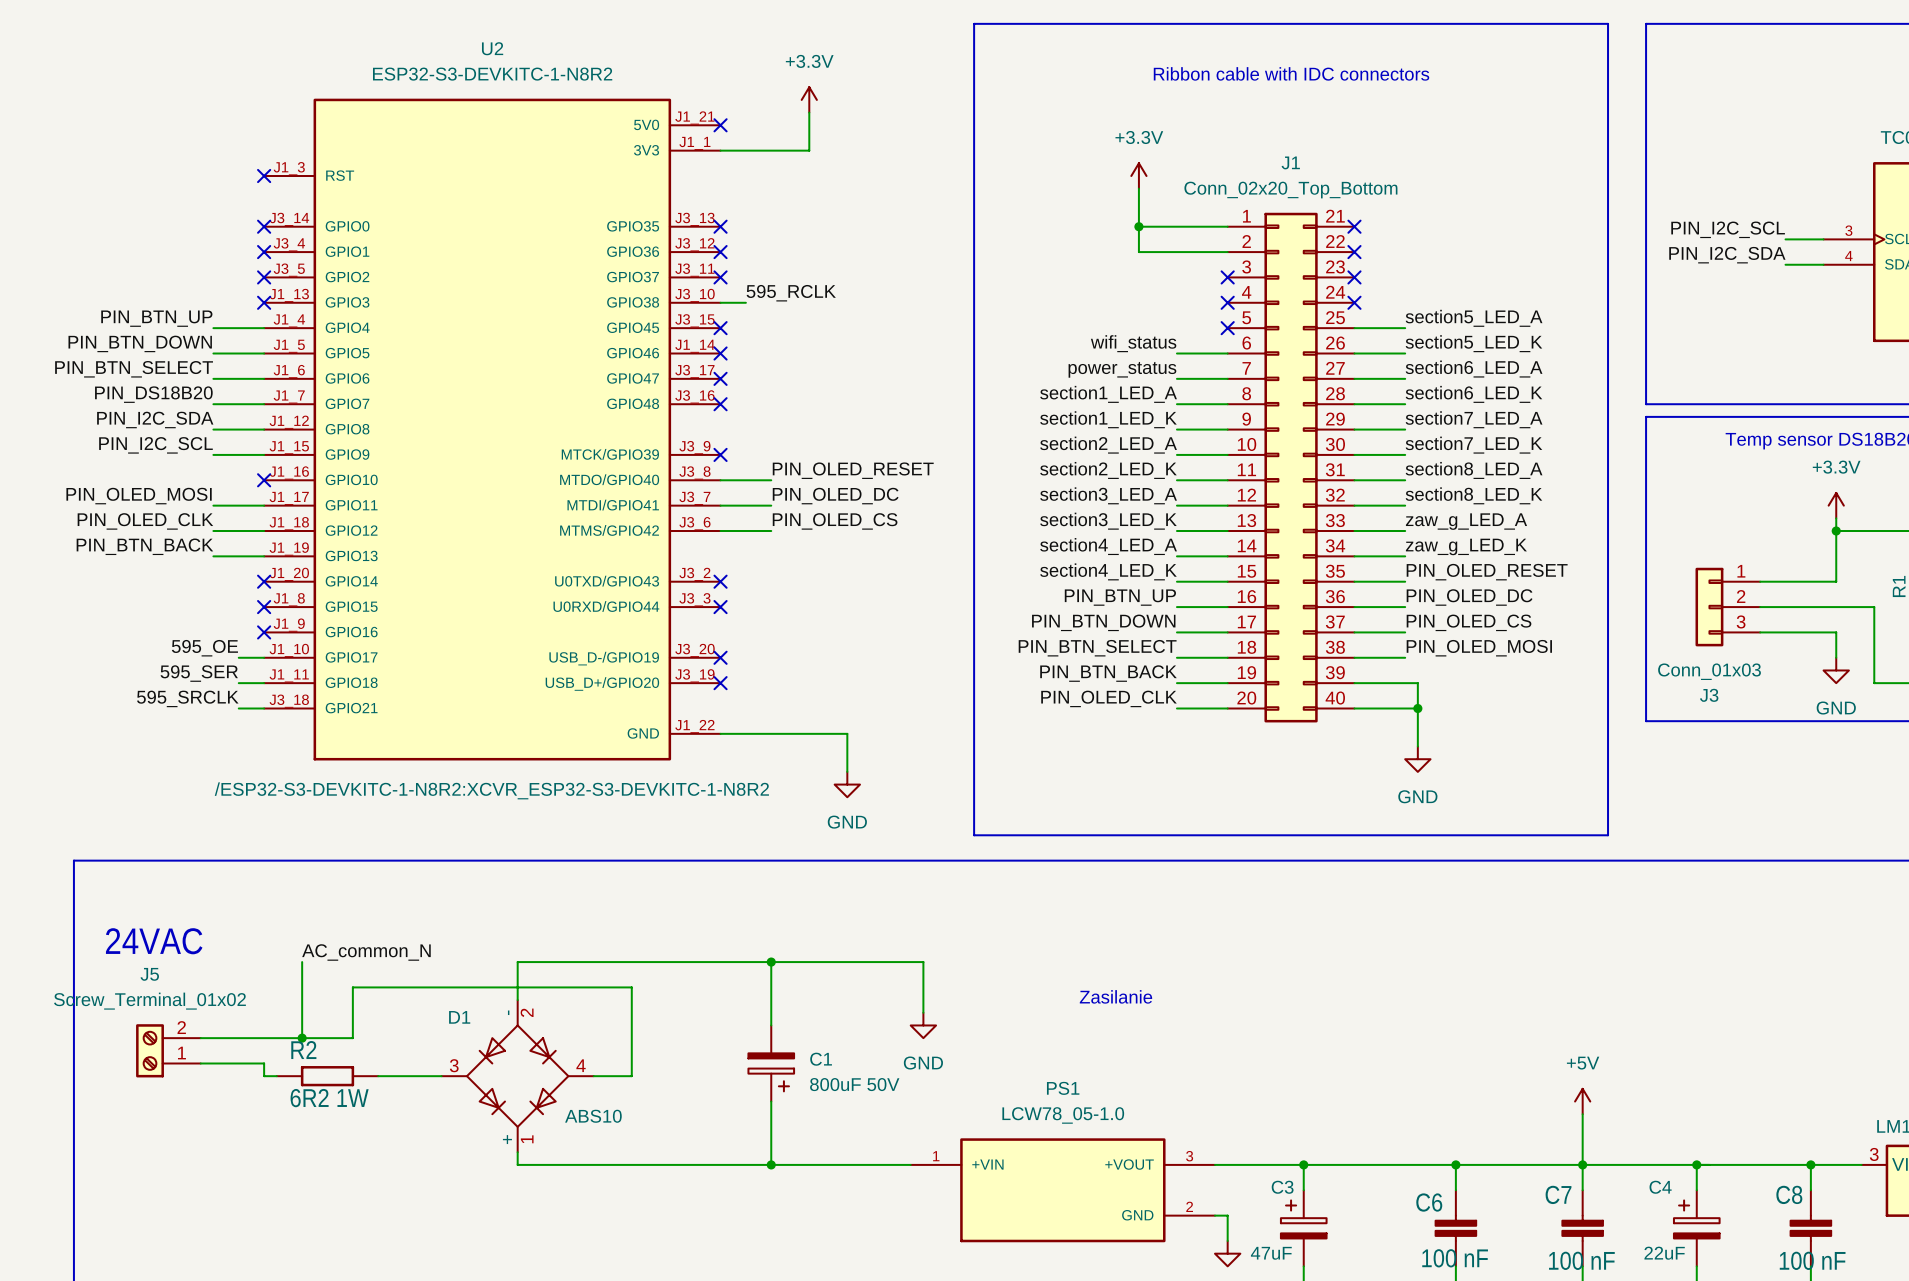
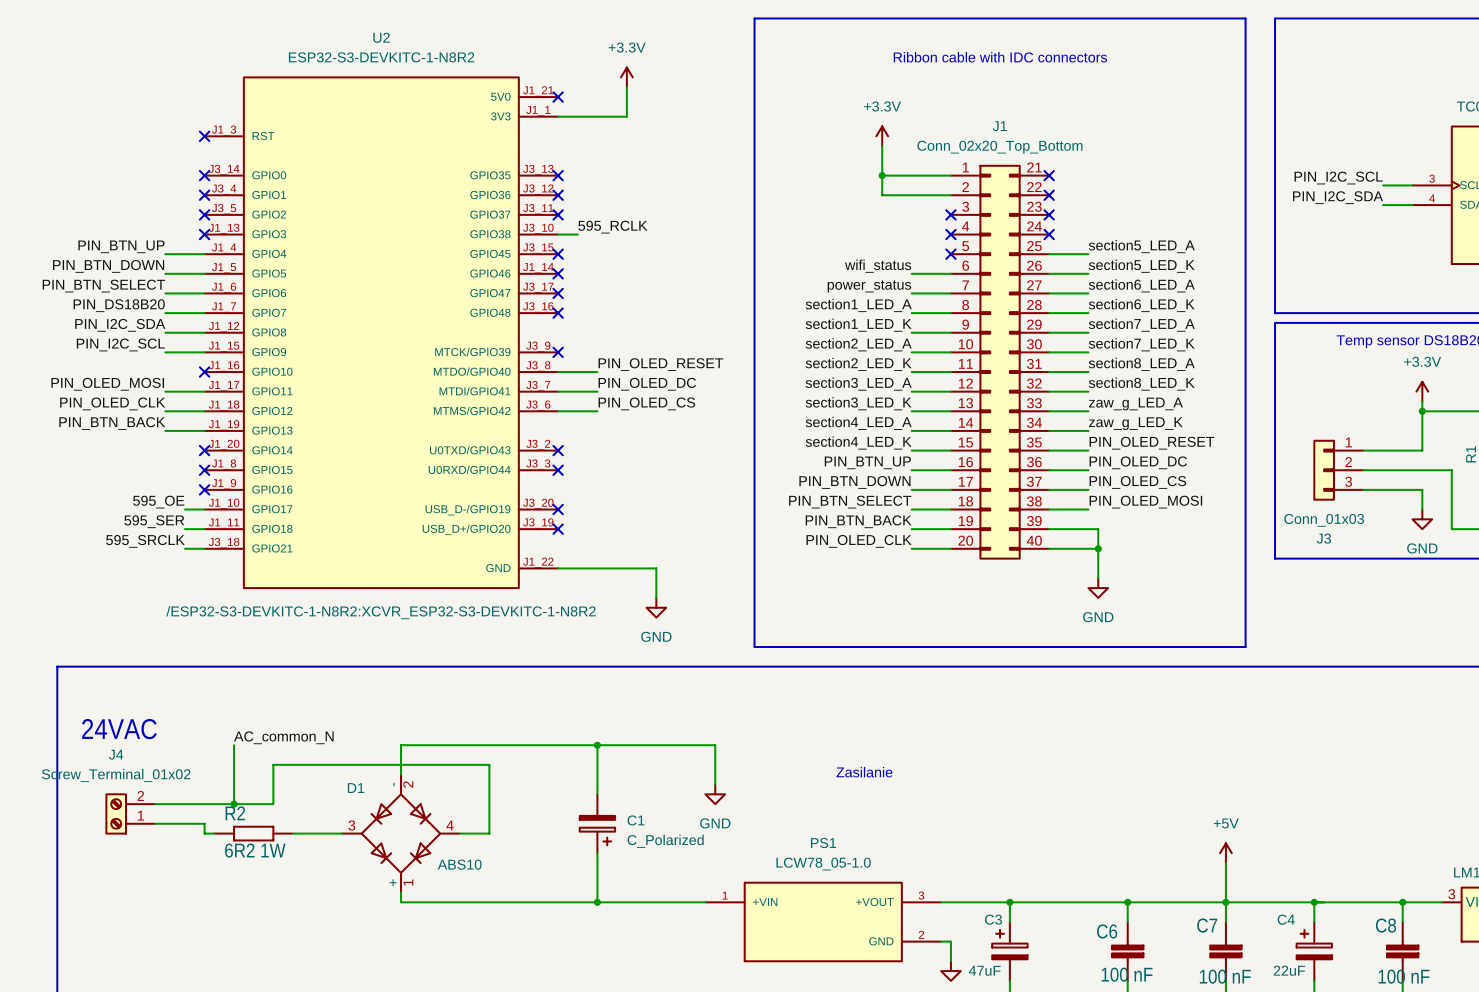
J5 name: J5 (149, 974) -> J4 (116, 754)
C1 value: 800uF 50V (854, 1084) -> C_Polarized (665, 841)

